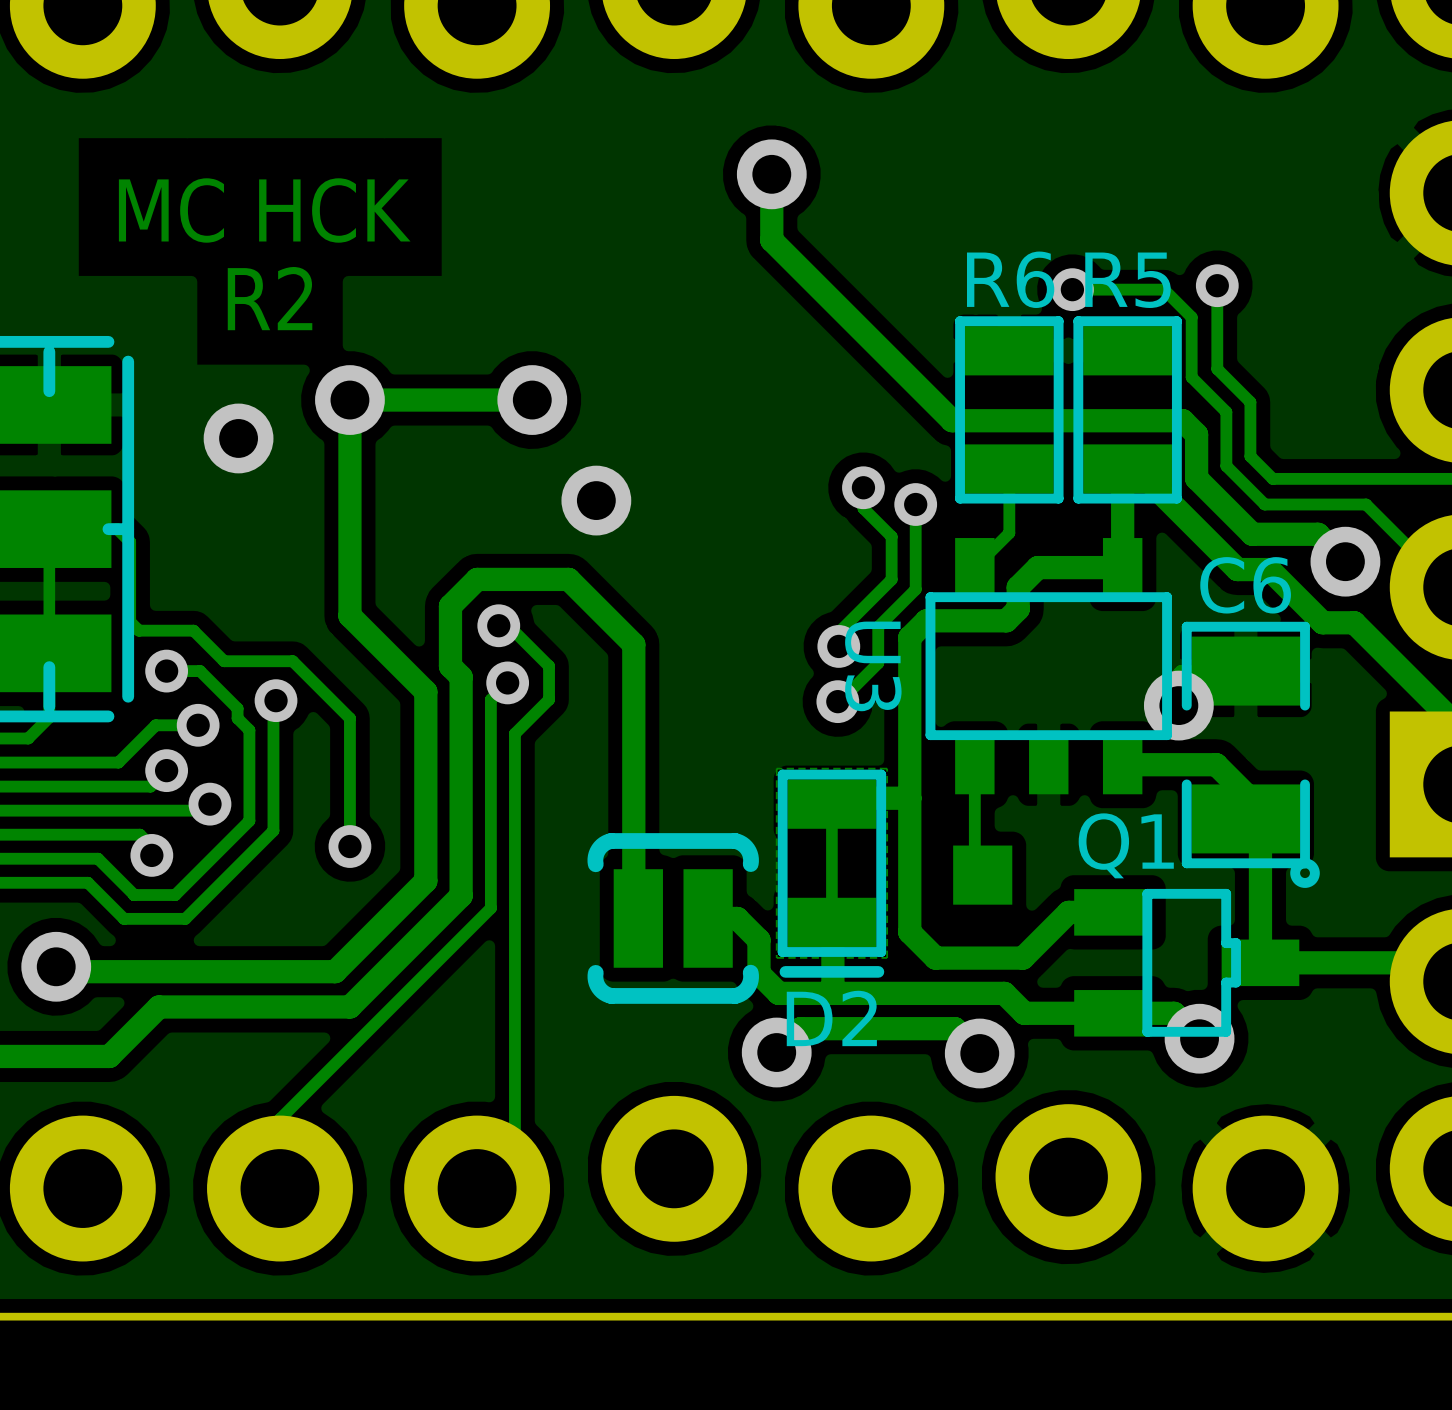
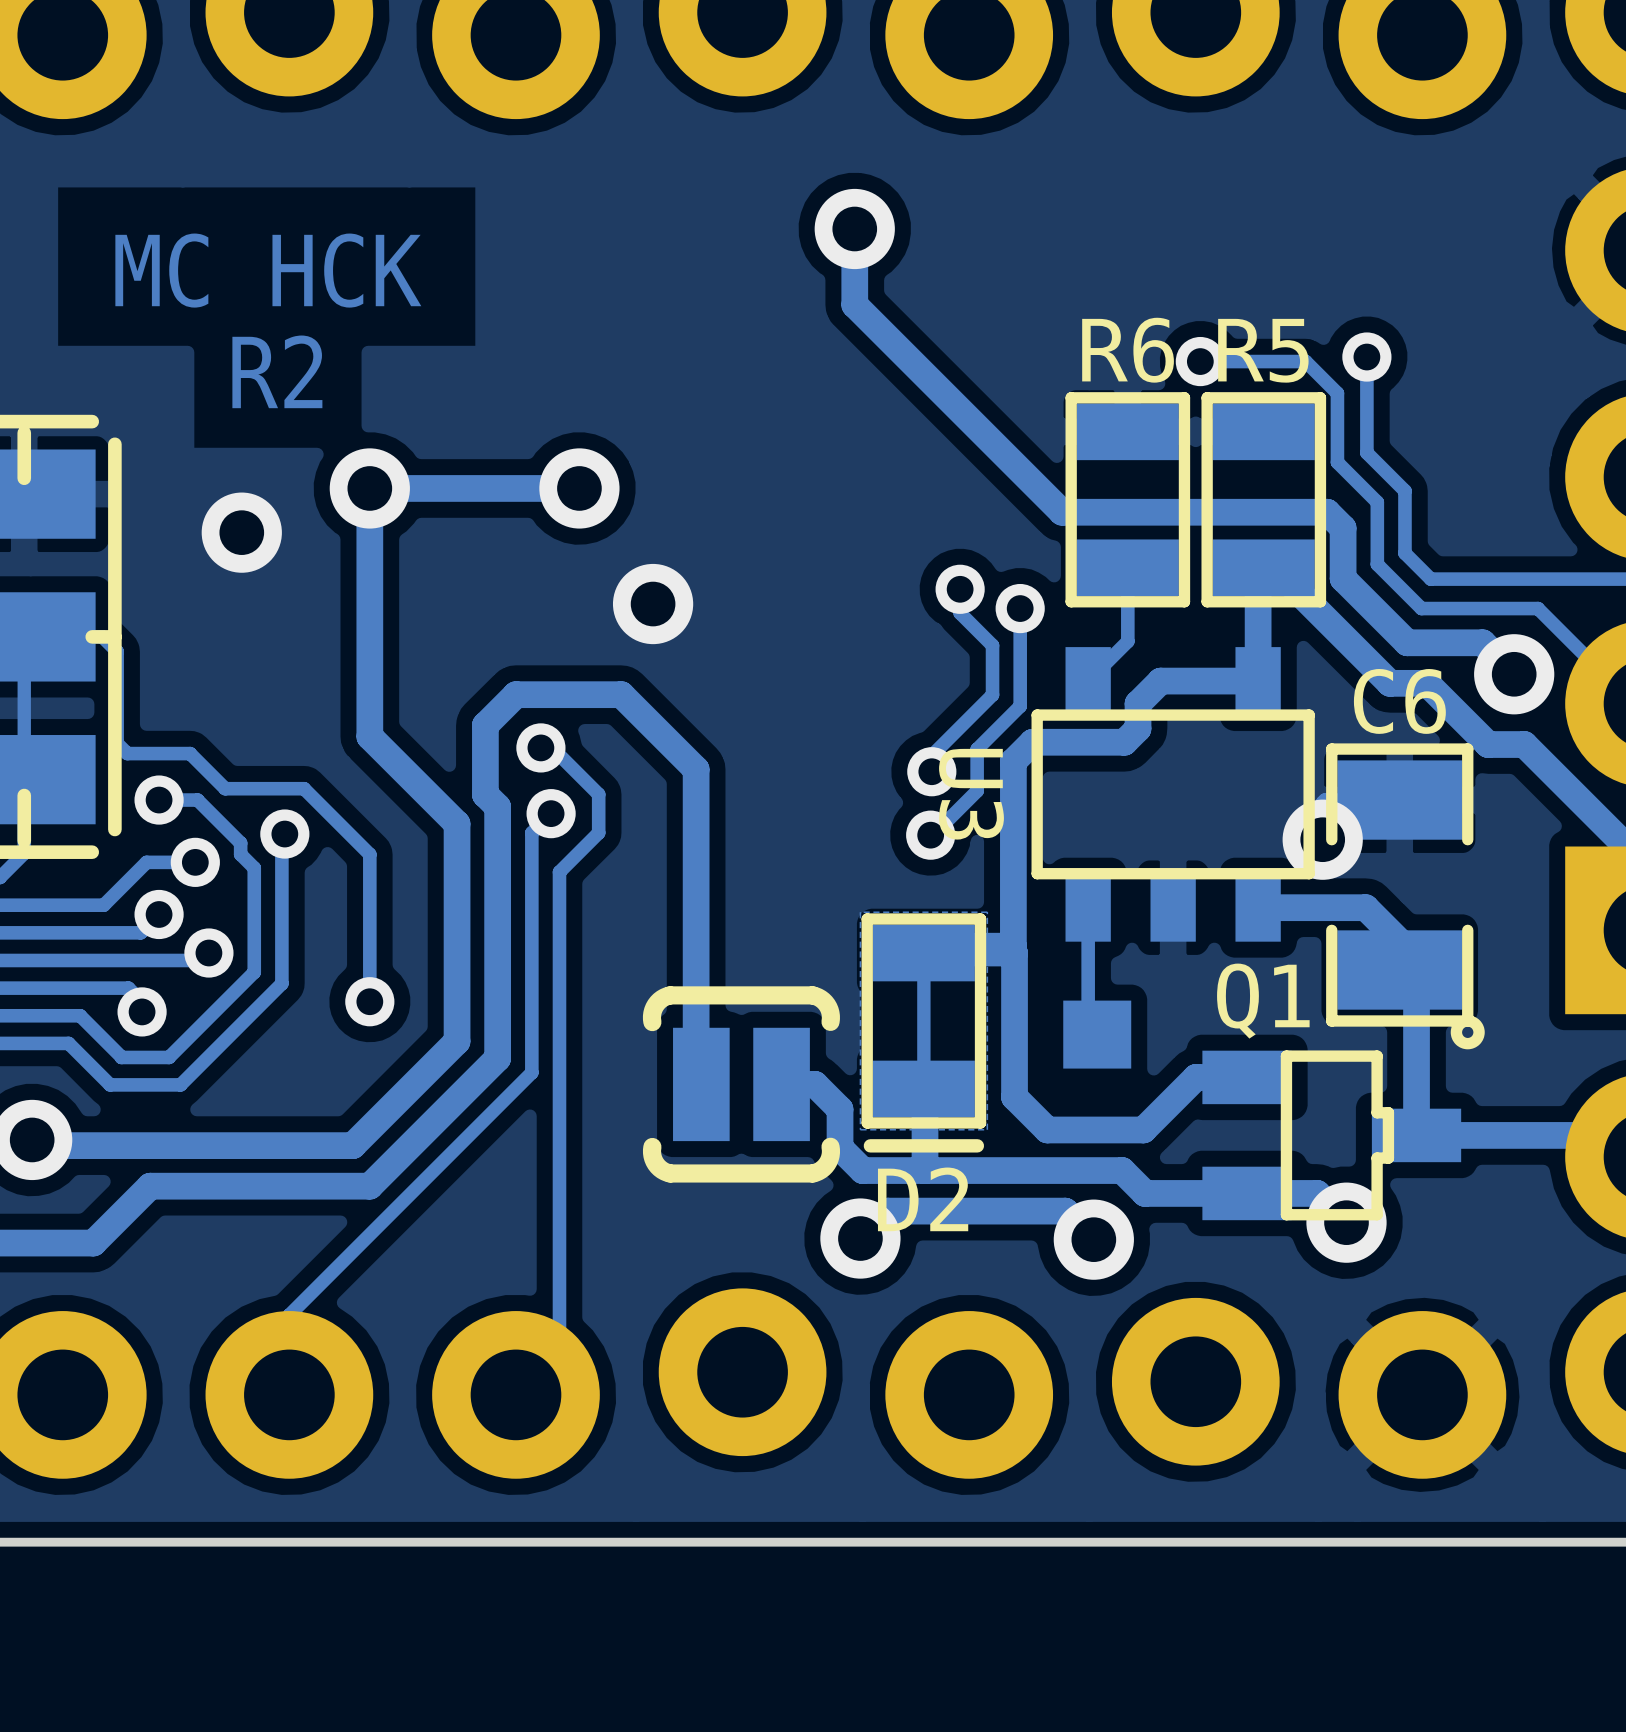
track: (909, 803) (909, 932) (935, 958) (939, 958) -> (923, 953) (1014, 953) (1014, 1097) (1047, 1129)

